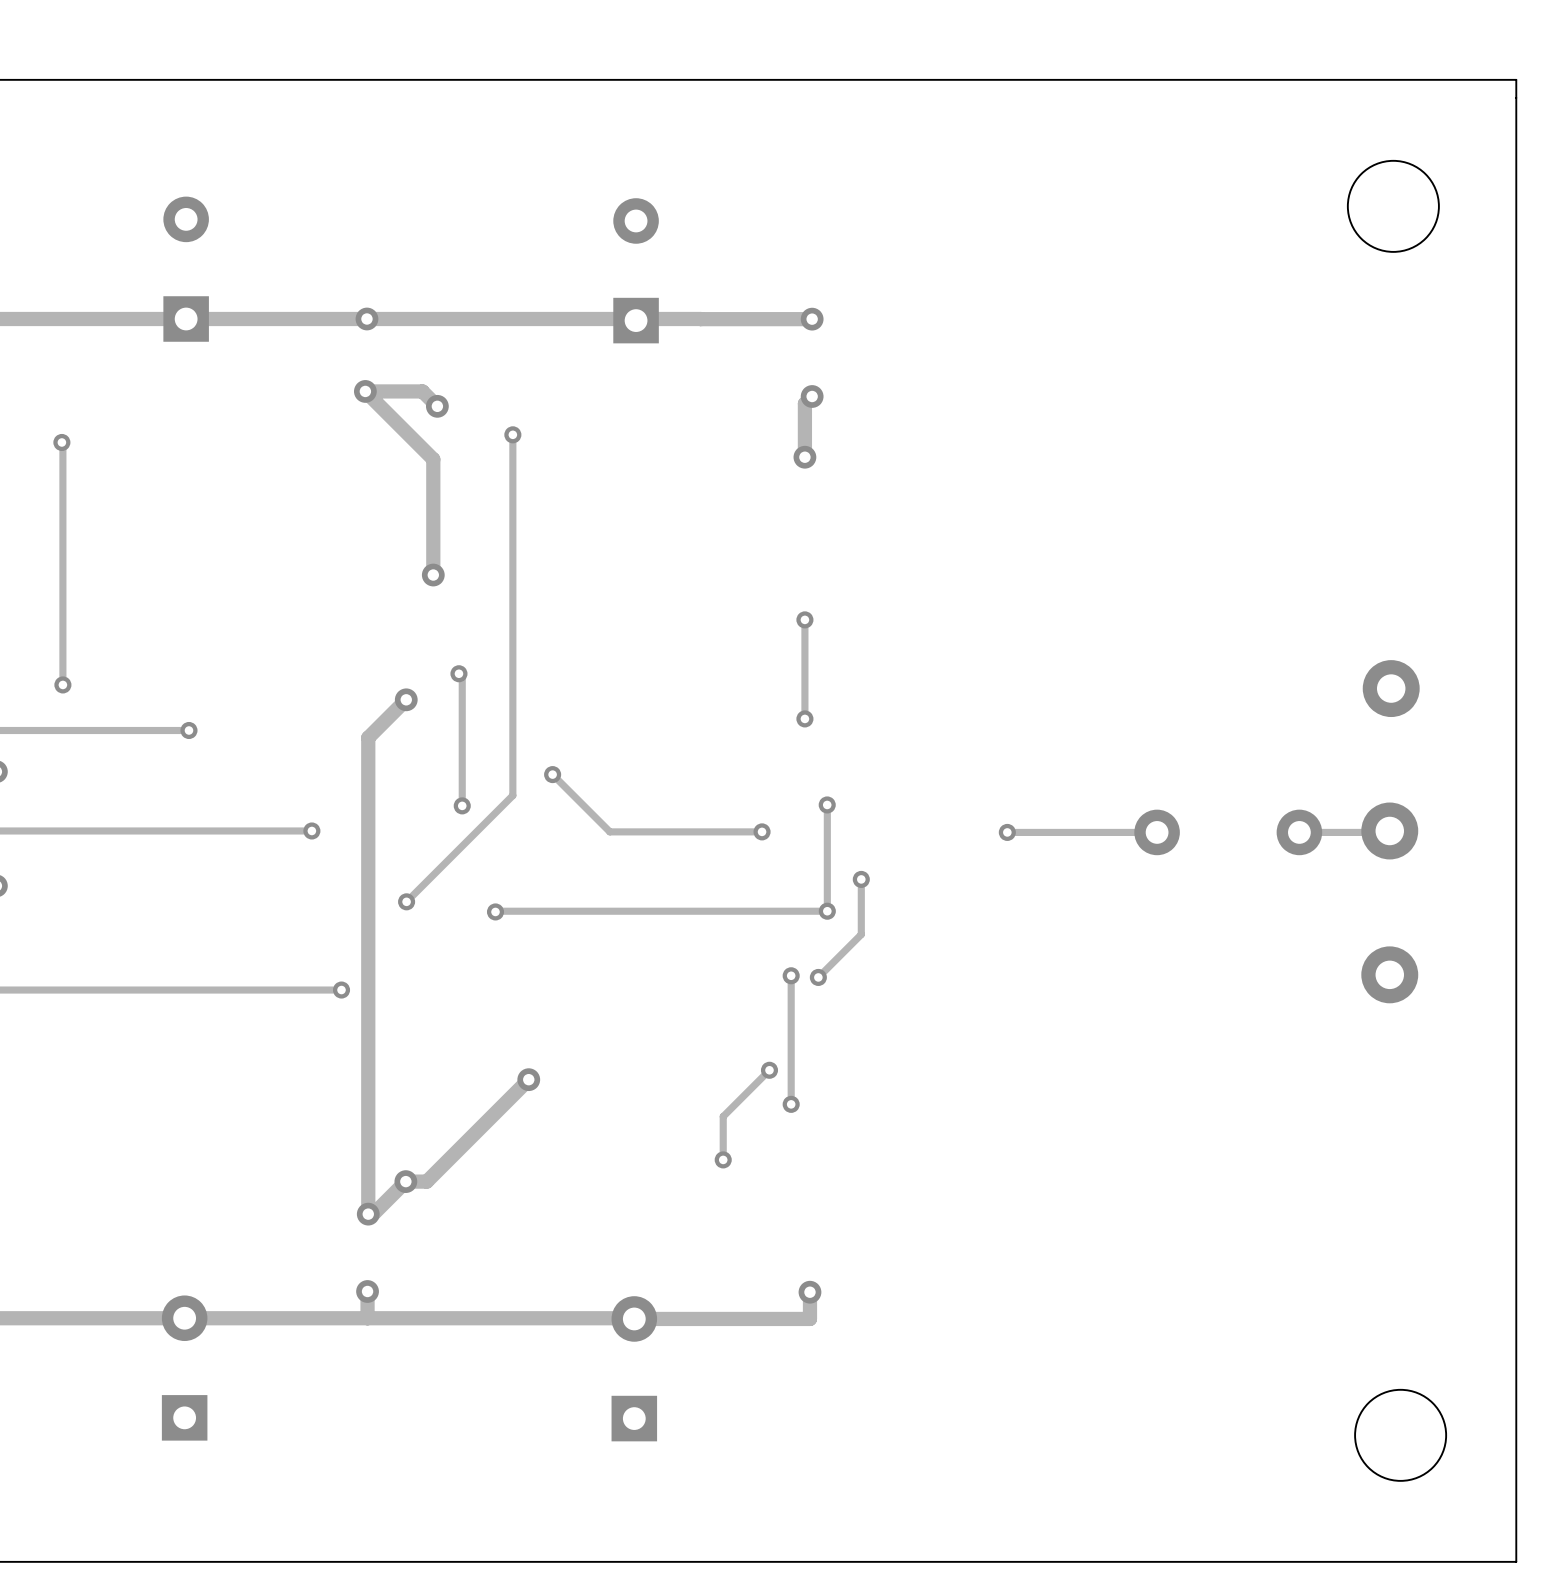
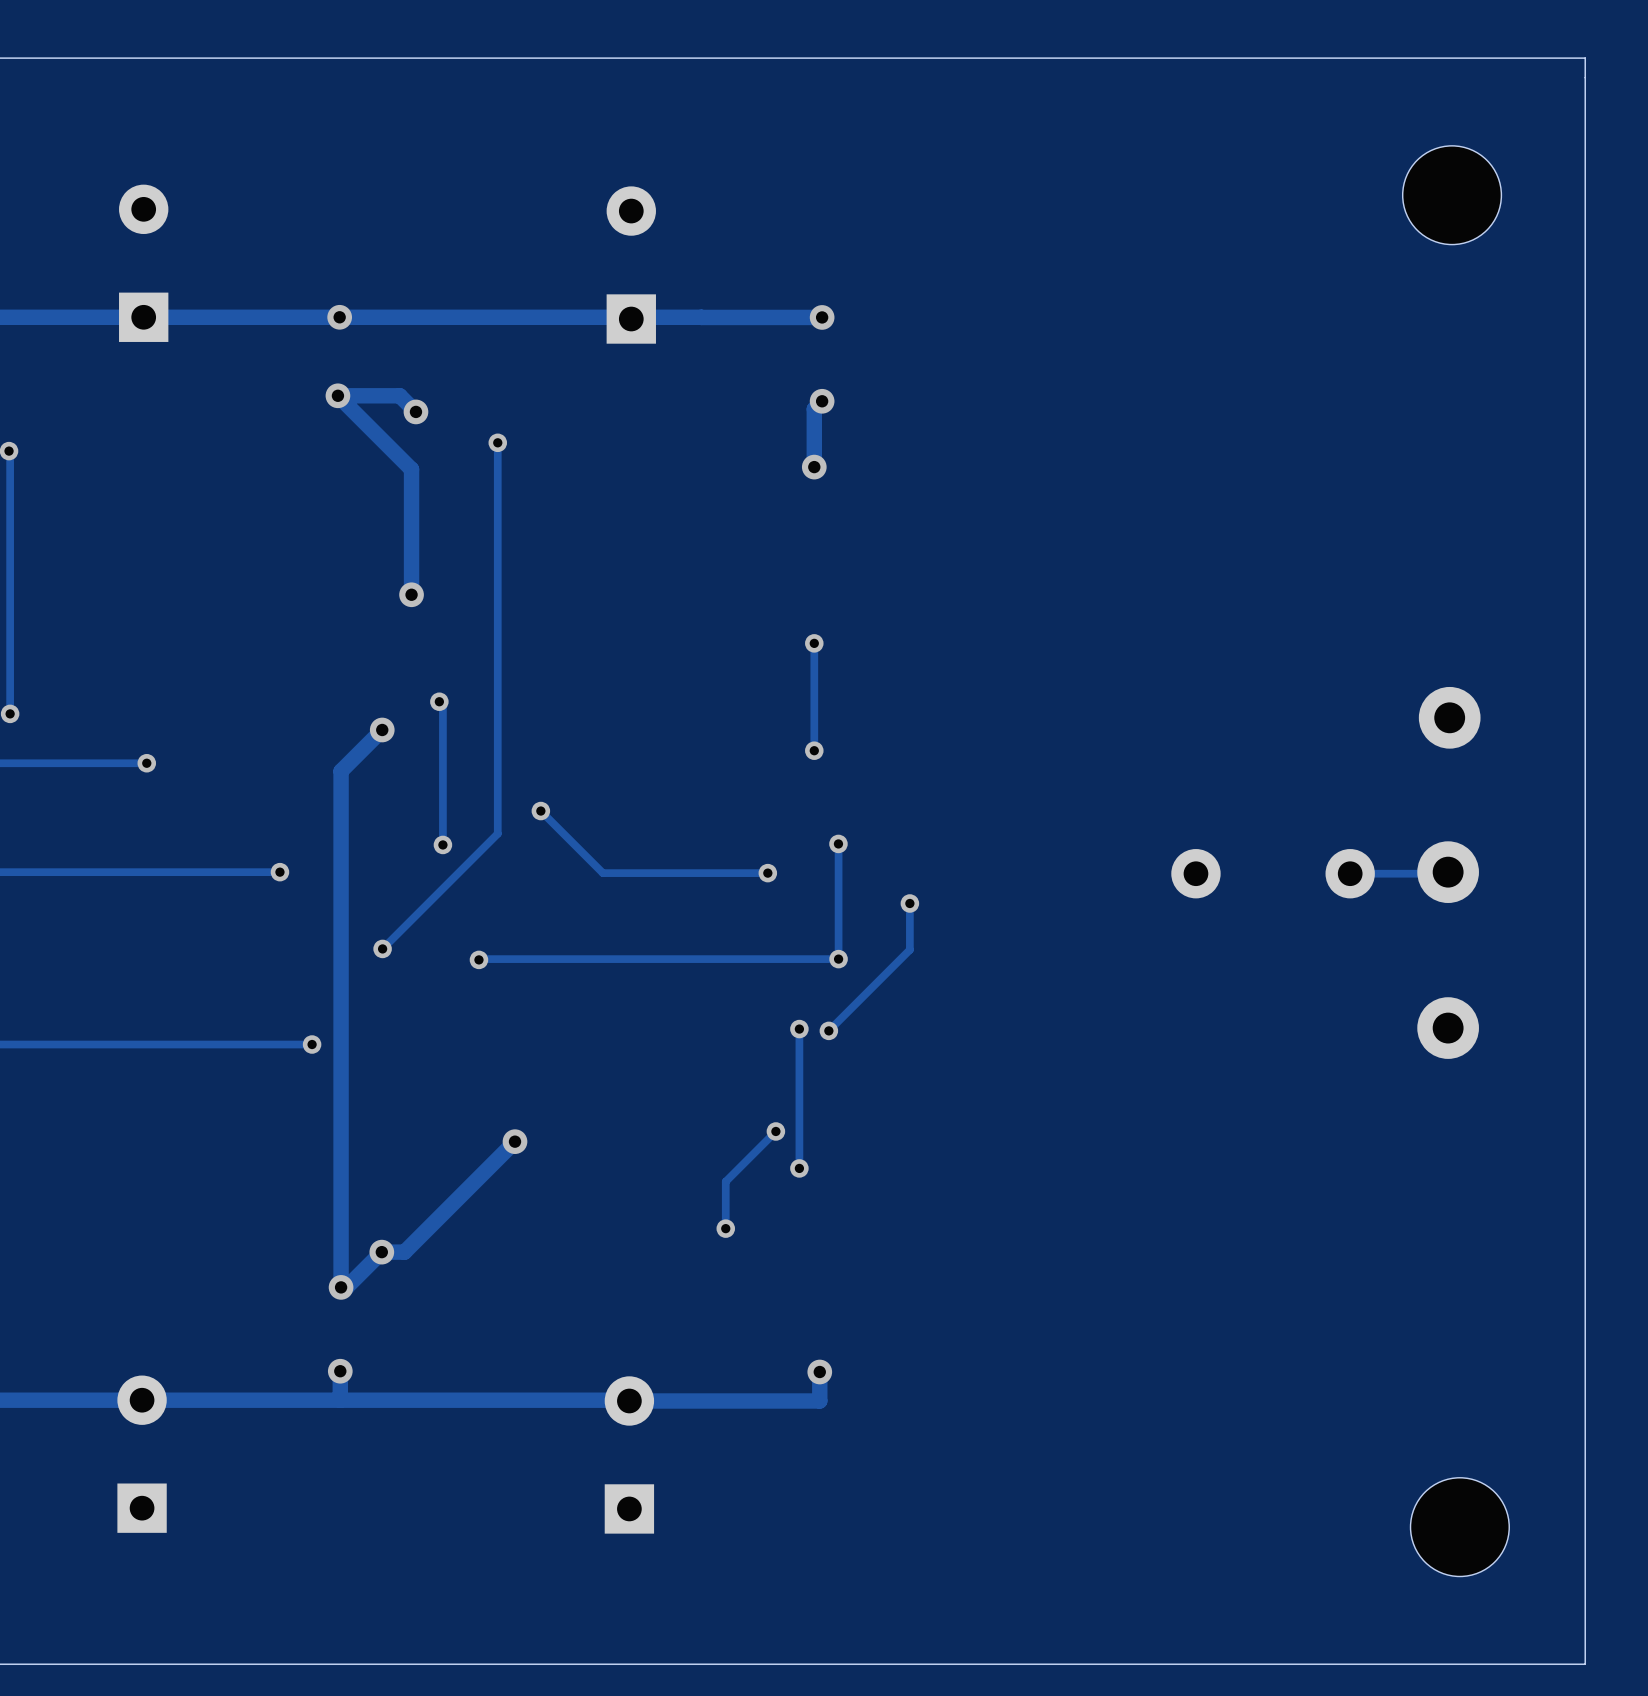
via: (1007, 832) -> none
track: (1157, 832) (1007, 832) -> none
track: (861, 879) (861, 934) -> (909, 903) (909, 949) (875, 984)
via position: (861, 879) -> (909, 903)

